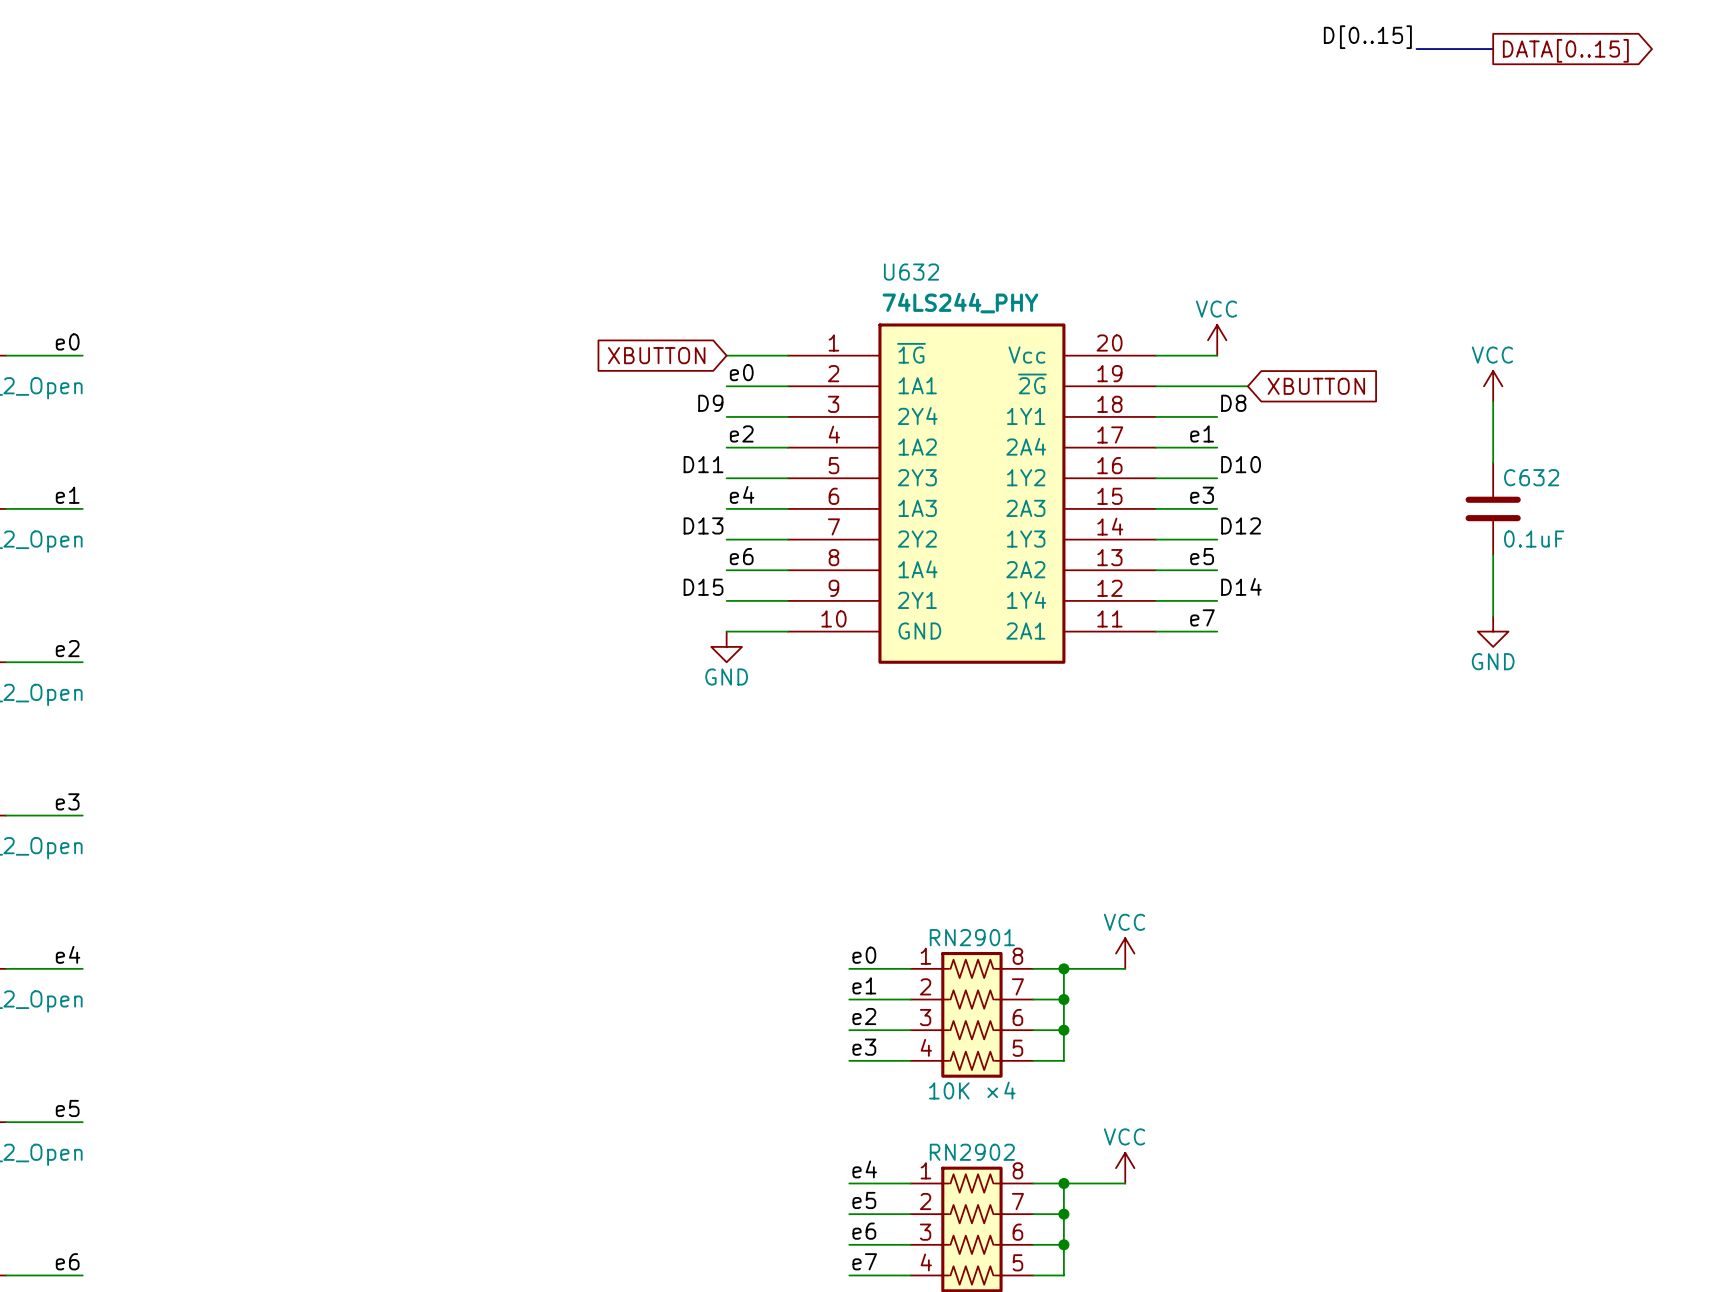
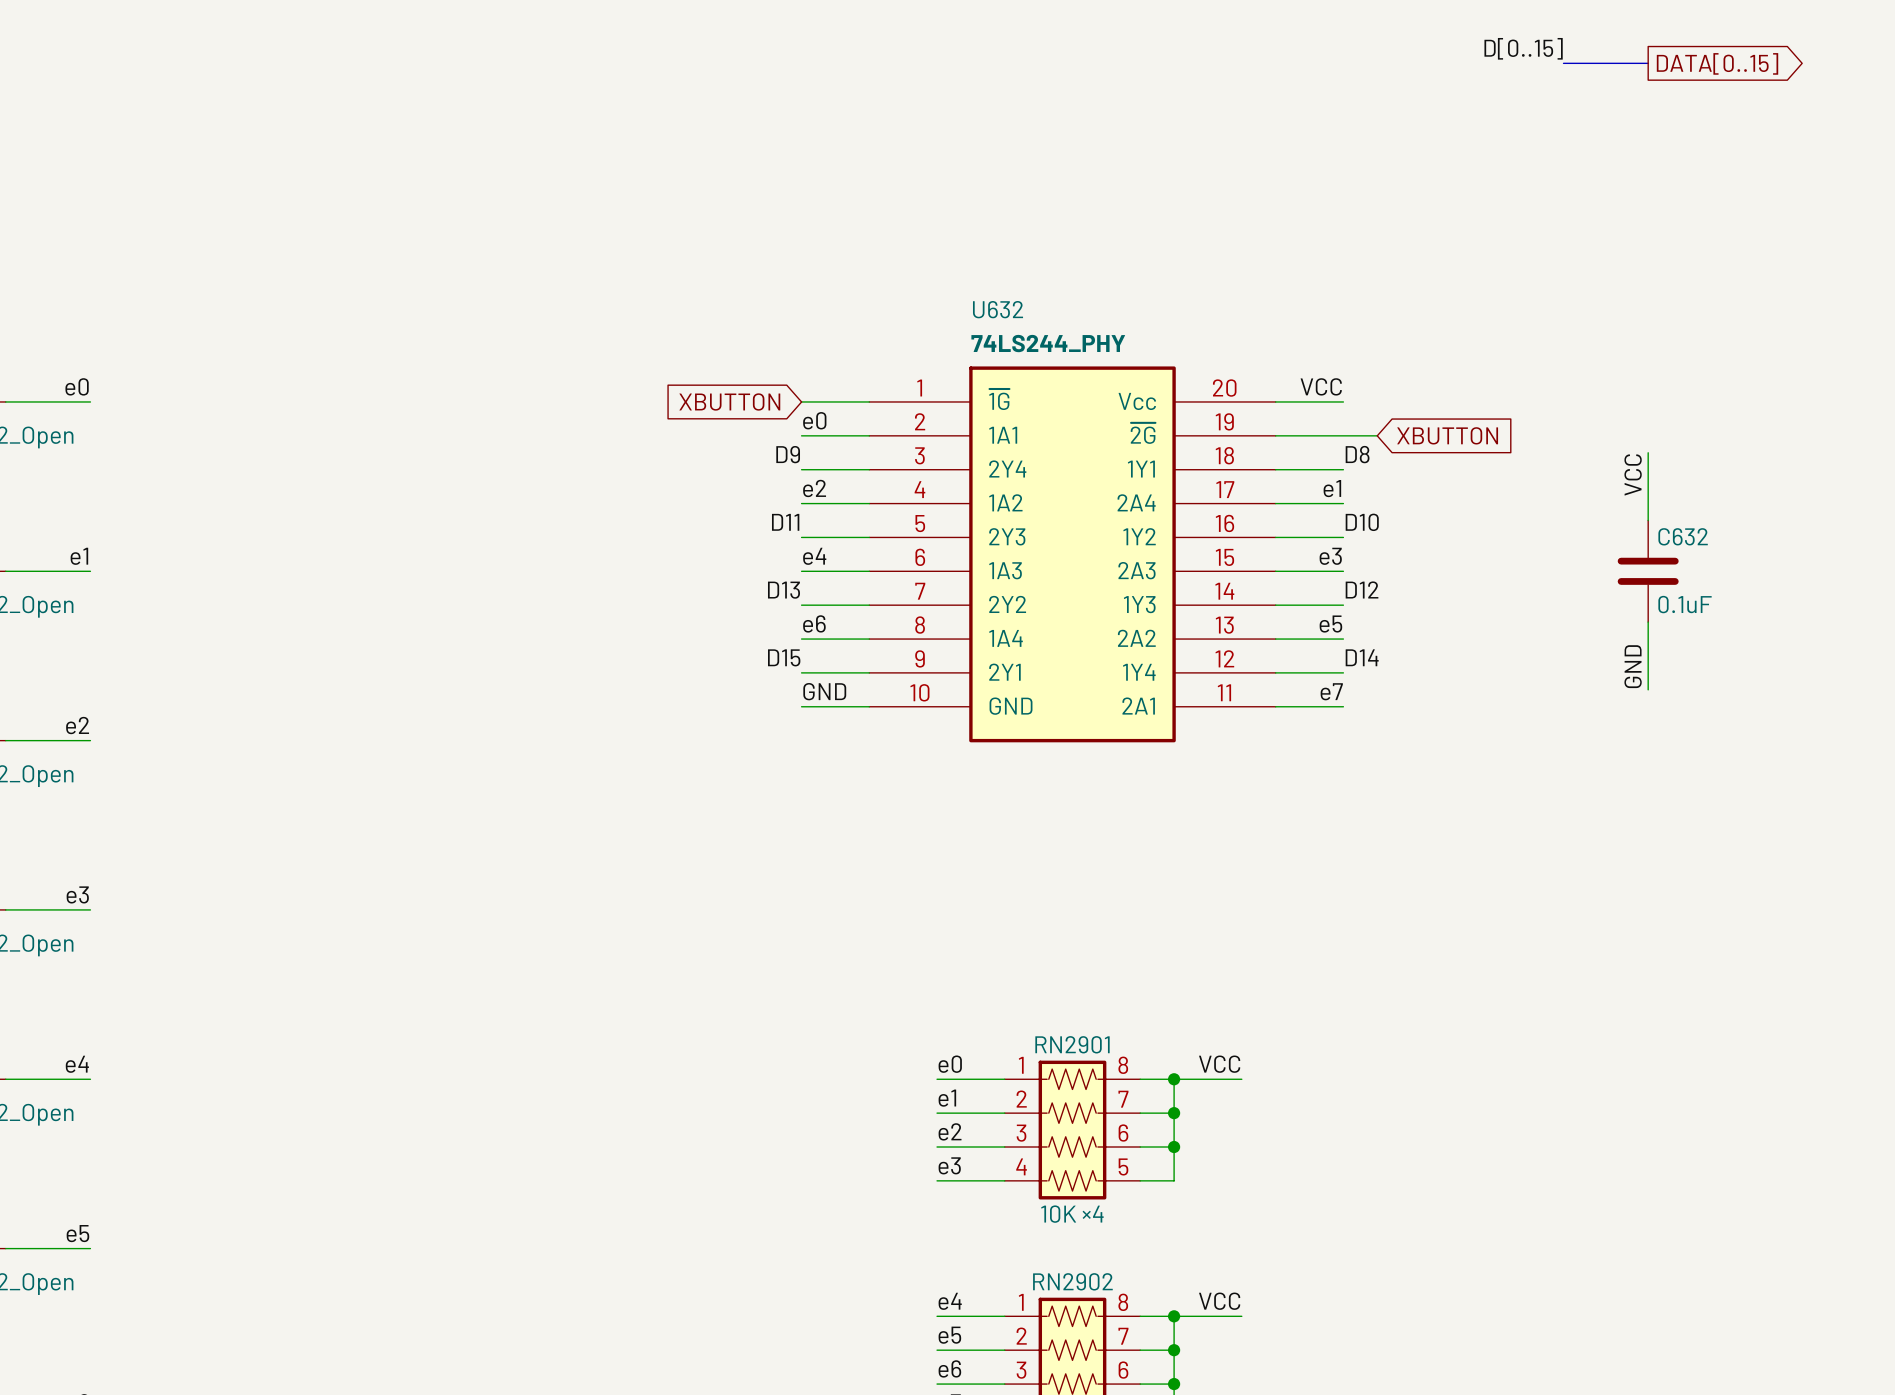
power symbol: VCC (1217, 340) -> none
label: none -> VCC (1321, 386)
power symbol: VCC (1493, 386) -> none
label: none -> VCC (1633, 474)
label: none -> GND (1633, 666)
label: none -> GND (824, 691)
power symbol: GND (1493, 631) -> none
power symbol: GND (726, 646) -> none
power symbol: VCC (1125, 953) -> none
label: none -> VCC (1219, 1064)
power symbol: VCC (1125, 1168) -> none
label: none -> VCC (1219, 1301)

